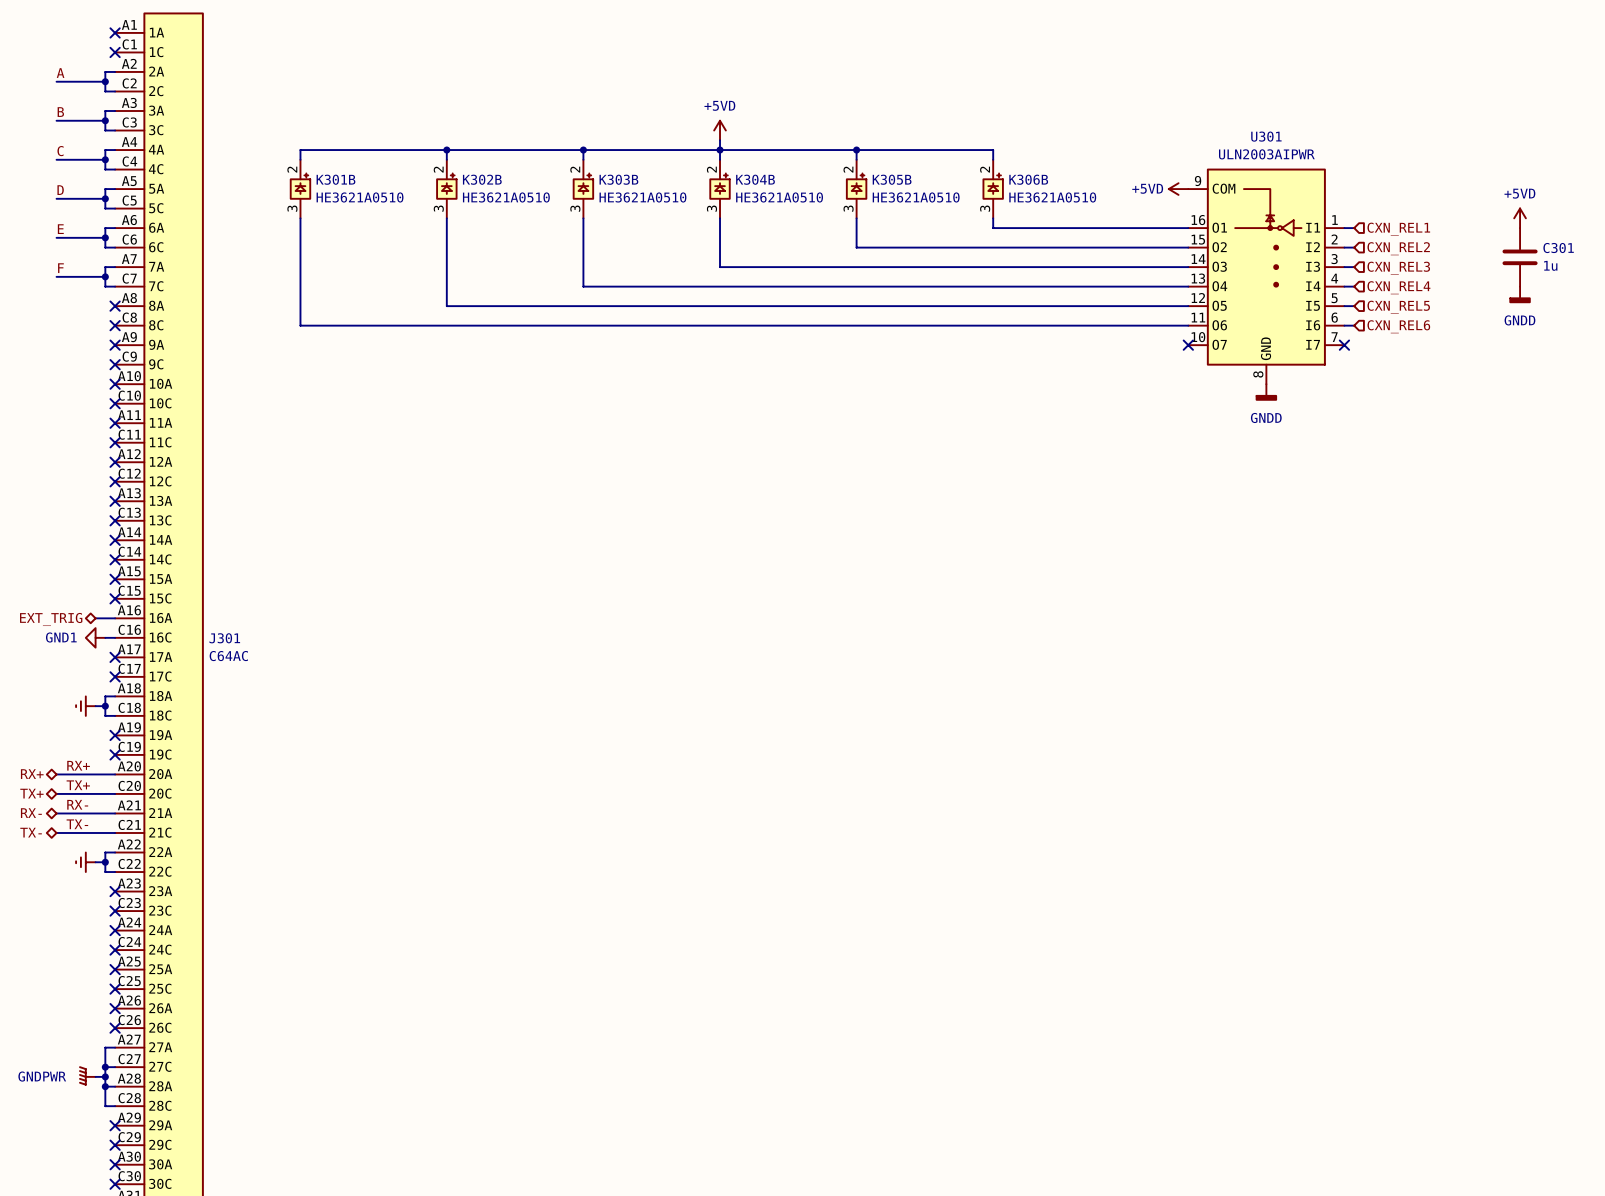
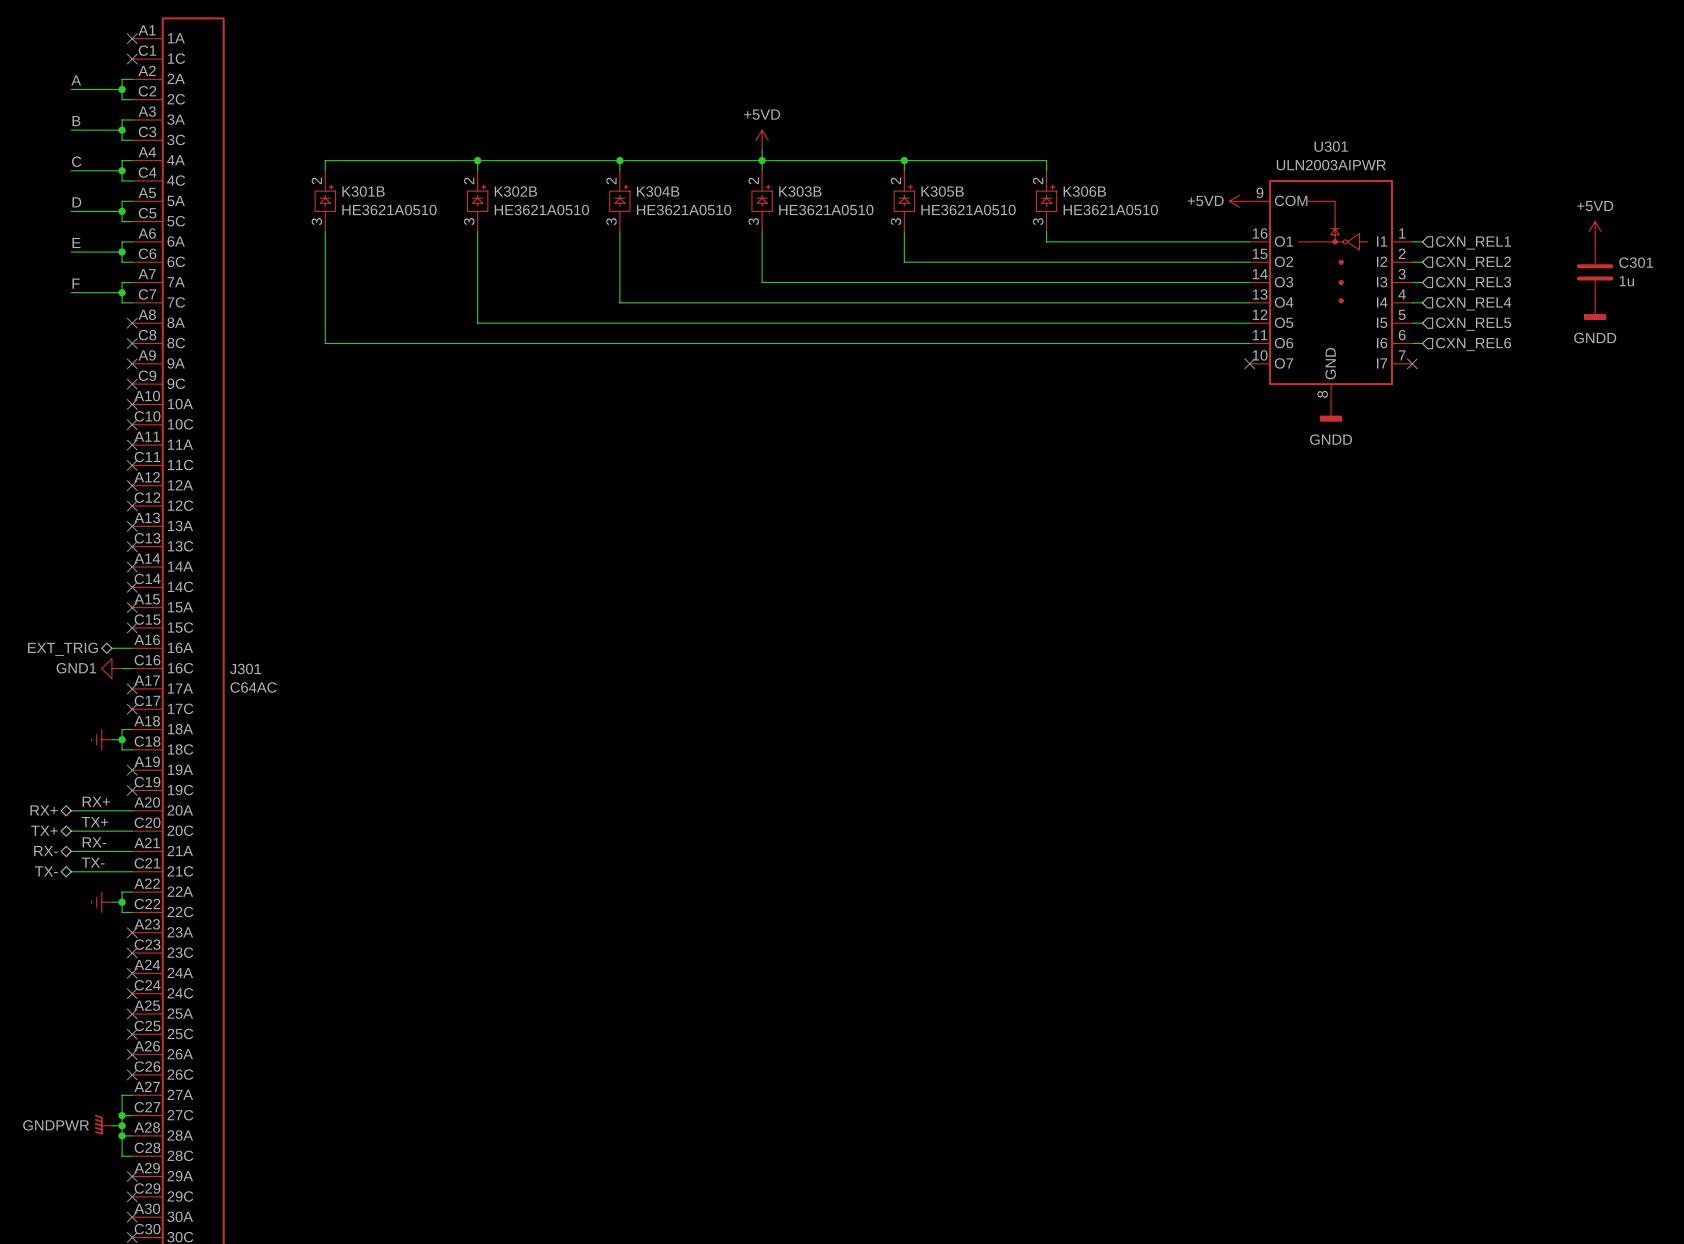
K303B name: K303B (618, 179) -> K304B (658, 191)
K304B name: K304B (755, 179) -> K303B (800, 191)

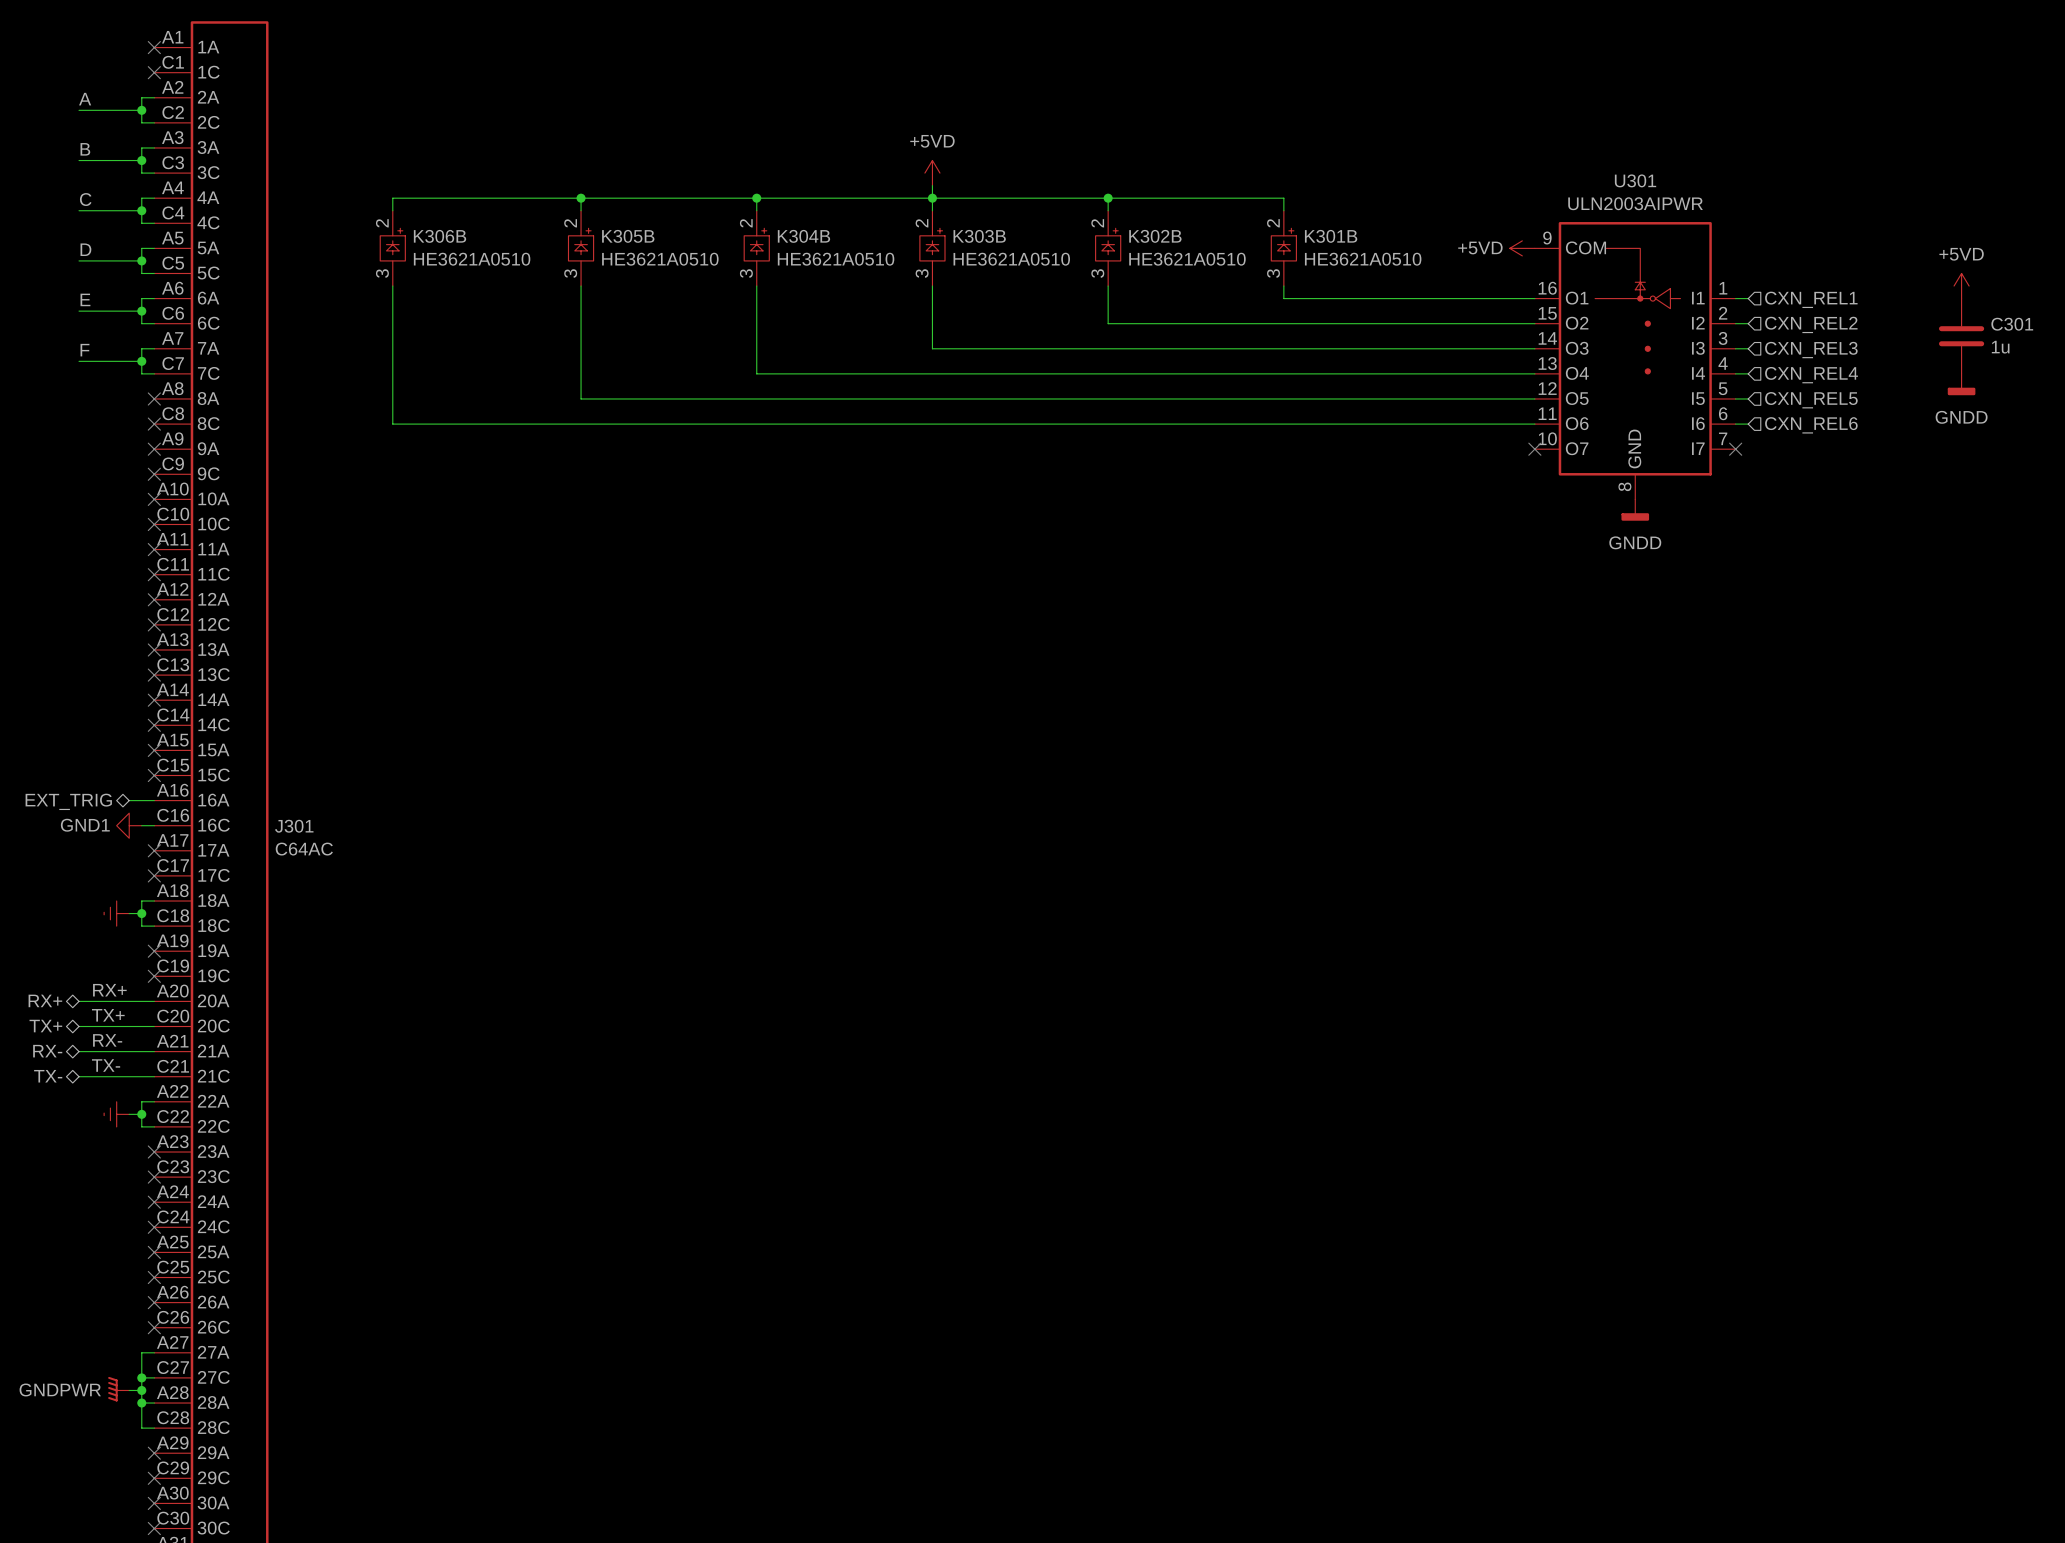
K301B name: K301B (363, 191) -> K306B (440, 236)
K302B name: K302B (515, 191) -> K305B (628, 236)
K305B name: K305B (942, 191) -> K302B (1155, 236)
K306B name: K306B (1084, 191) -> K301B (1331, 236)

